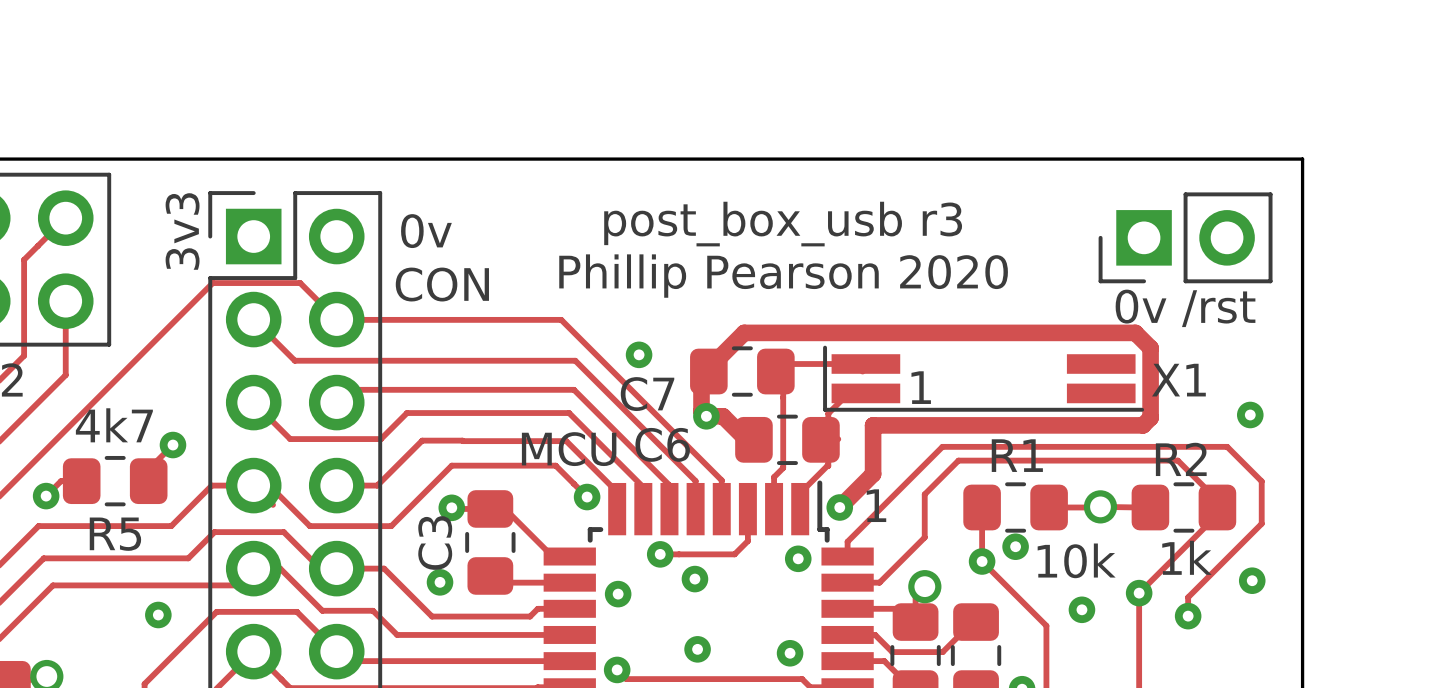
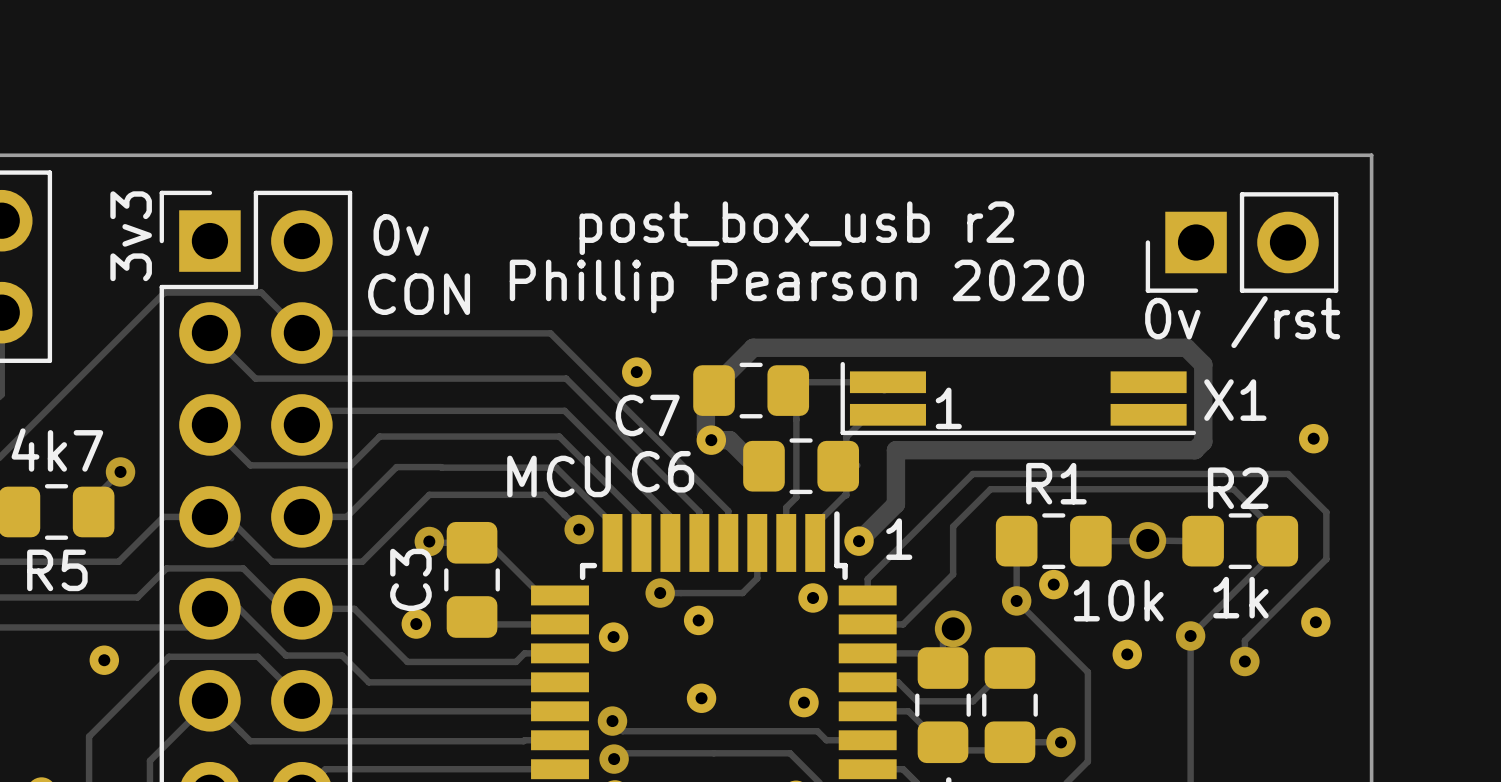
text: post_box_usb r3 (783, 224) -> post_box_usb r2 (796, 228)

